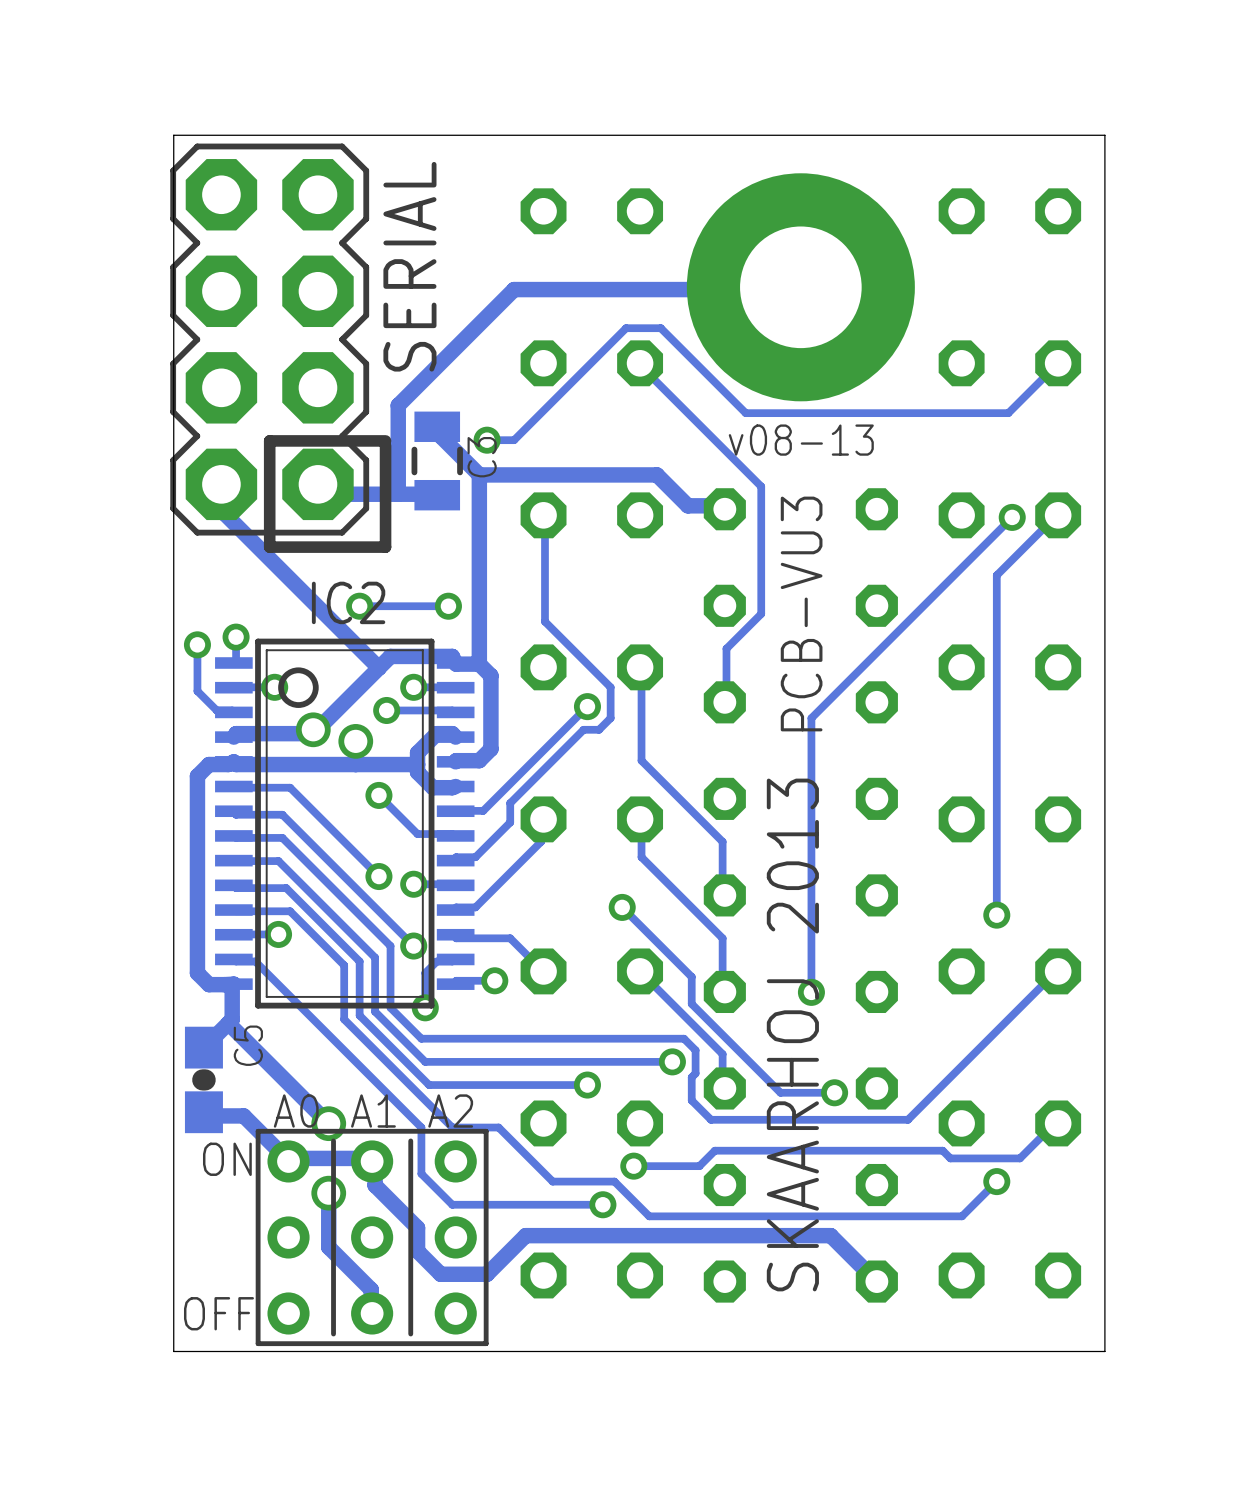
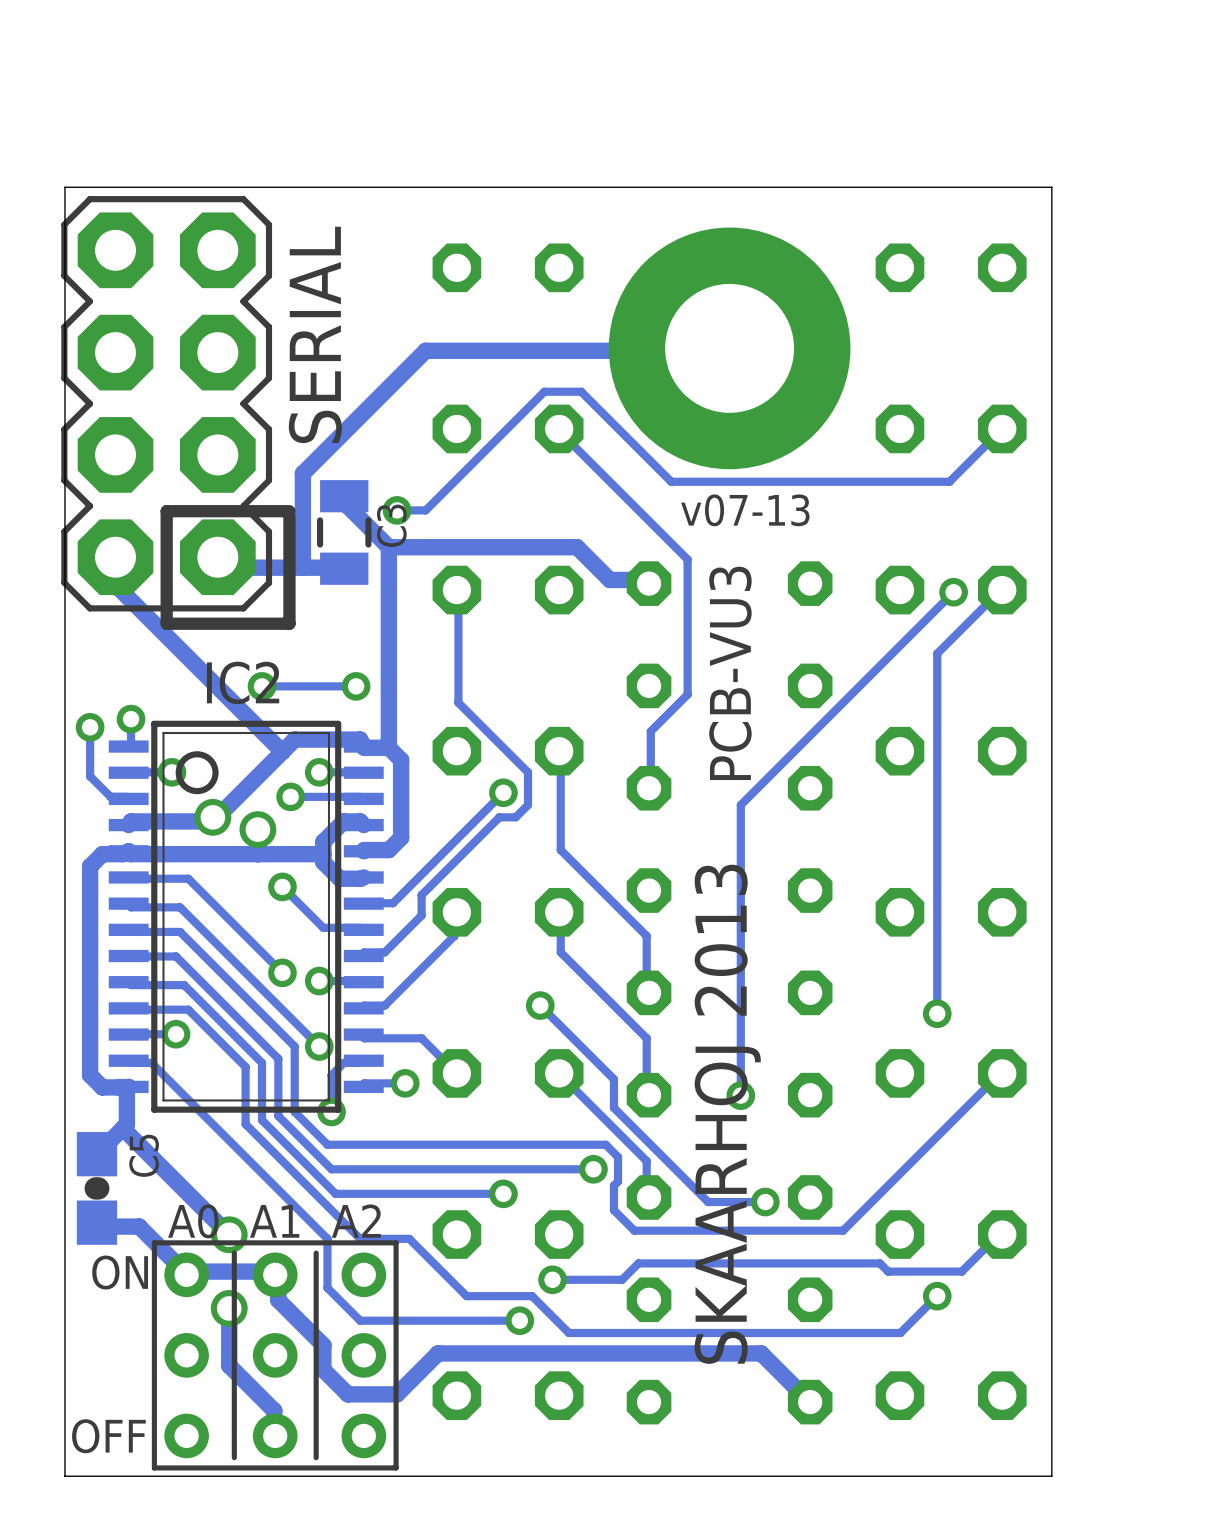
text: v08-13 (801, 440) -> v07-13 (745, 510)

